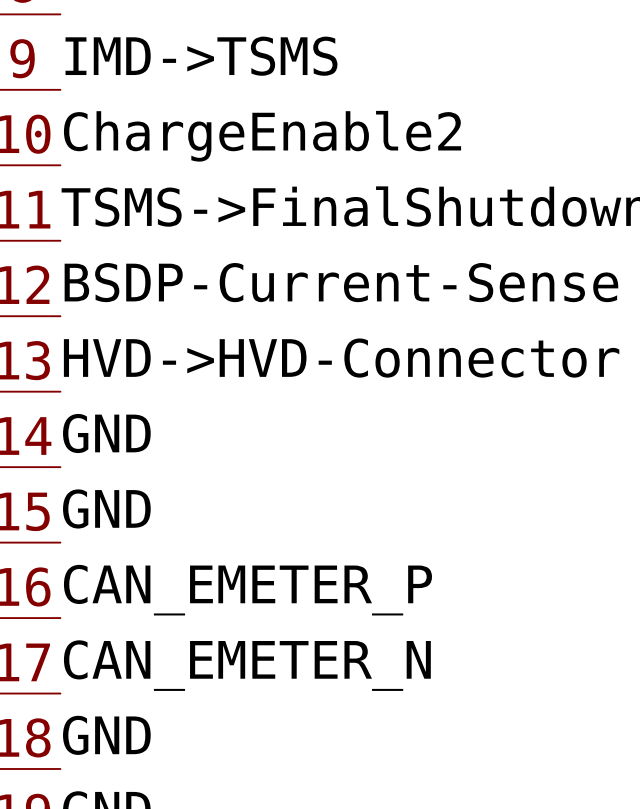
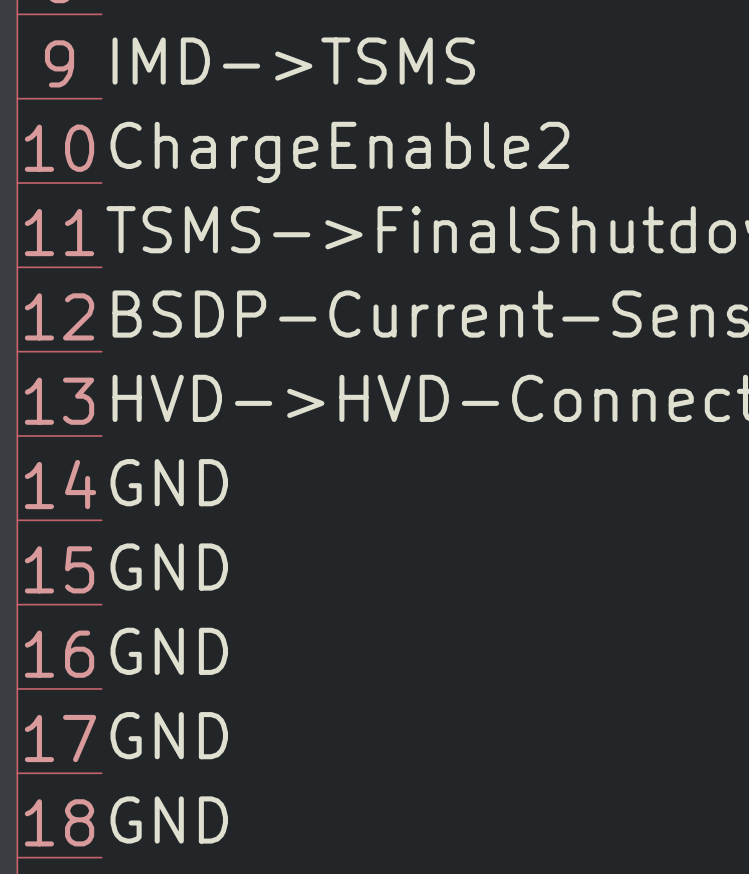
label: CAN_EMETER_P (247, 590) -> GND (169, 651)
label: CAN_EMETER_N (247, 665) -> GND (169, 735)

